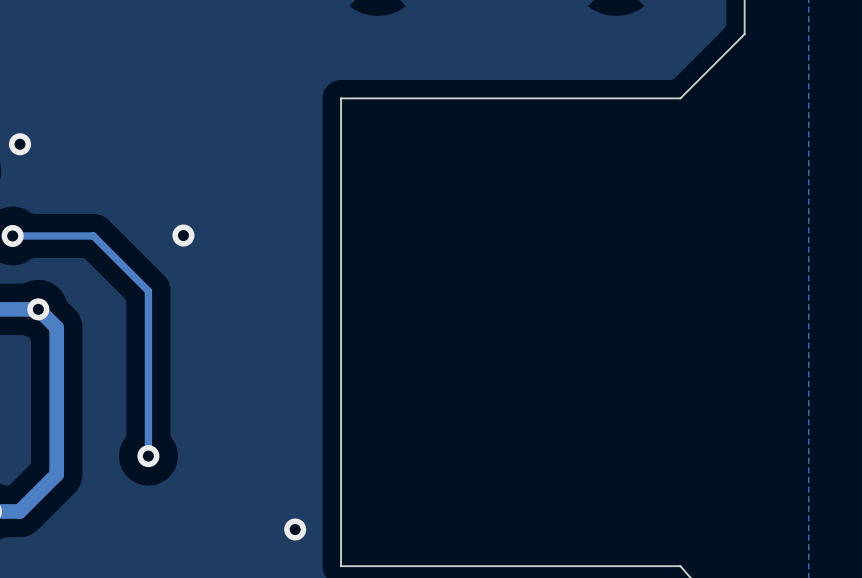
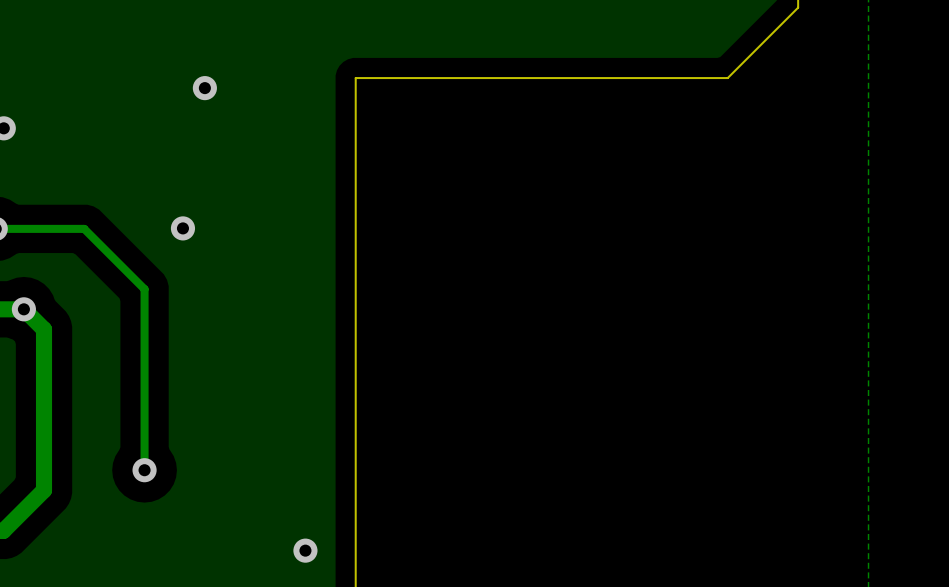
via: none -> (204, 88)

